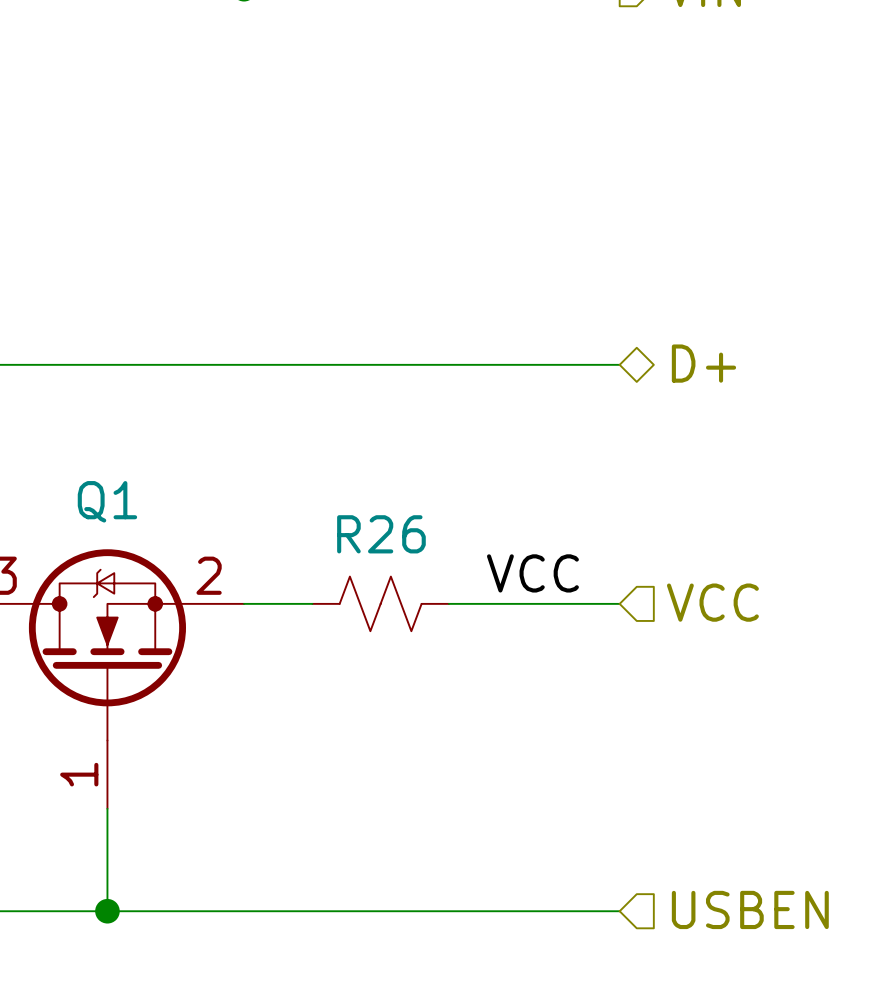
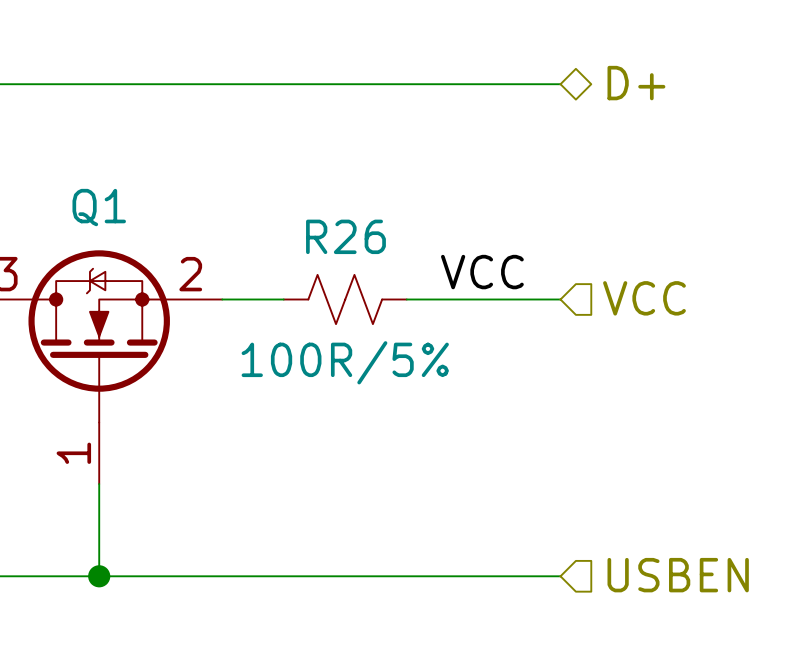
R26 value: none -> 100R/5% (345, 362)

